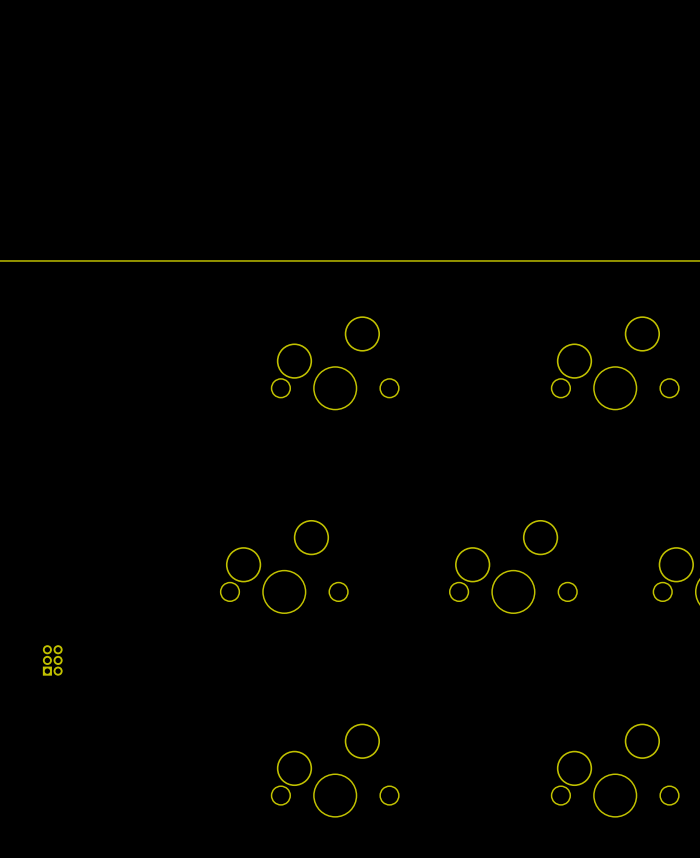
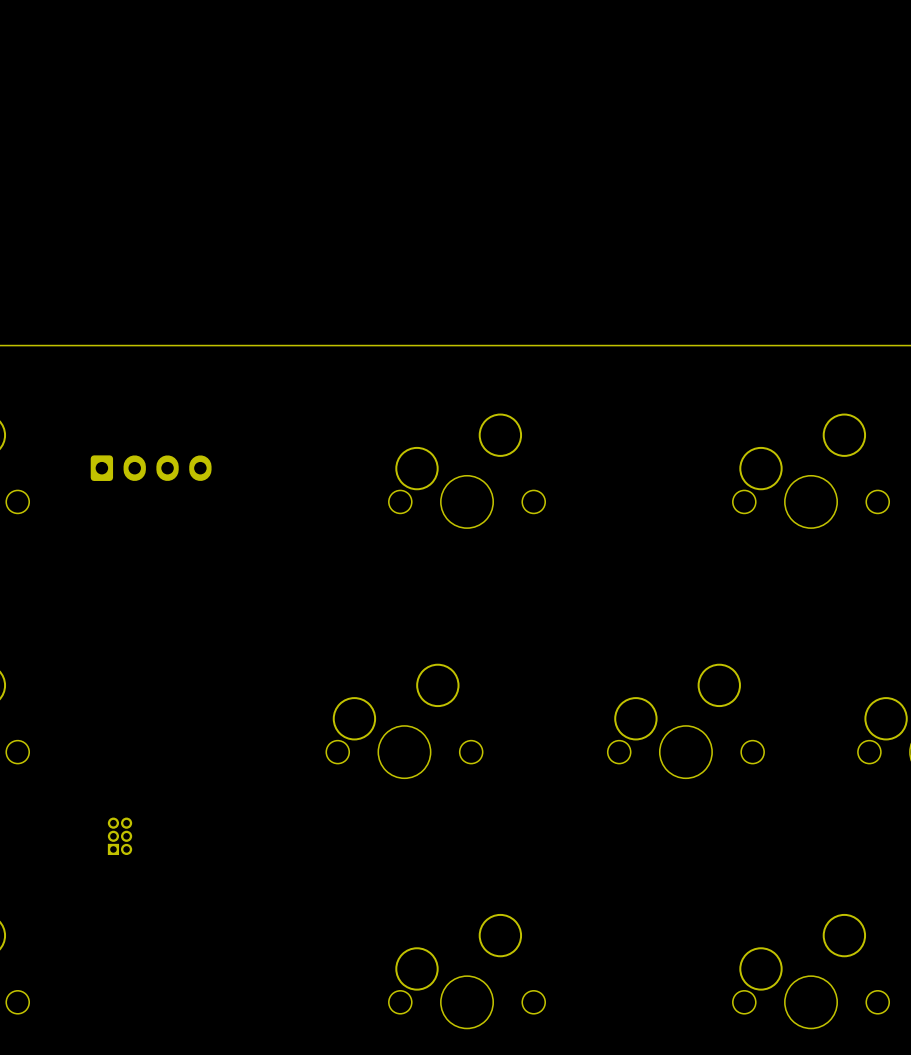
part: none -> (151, 468)

